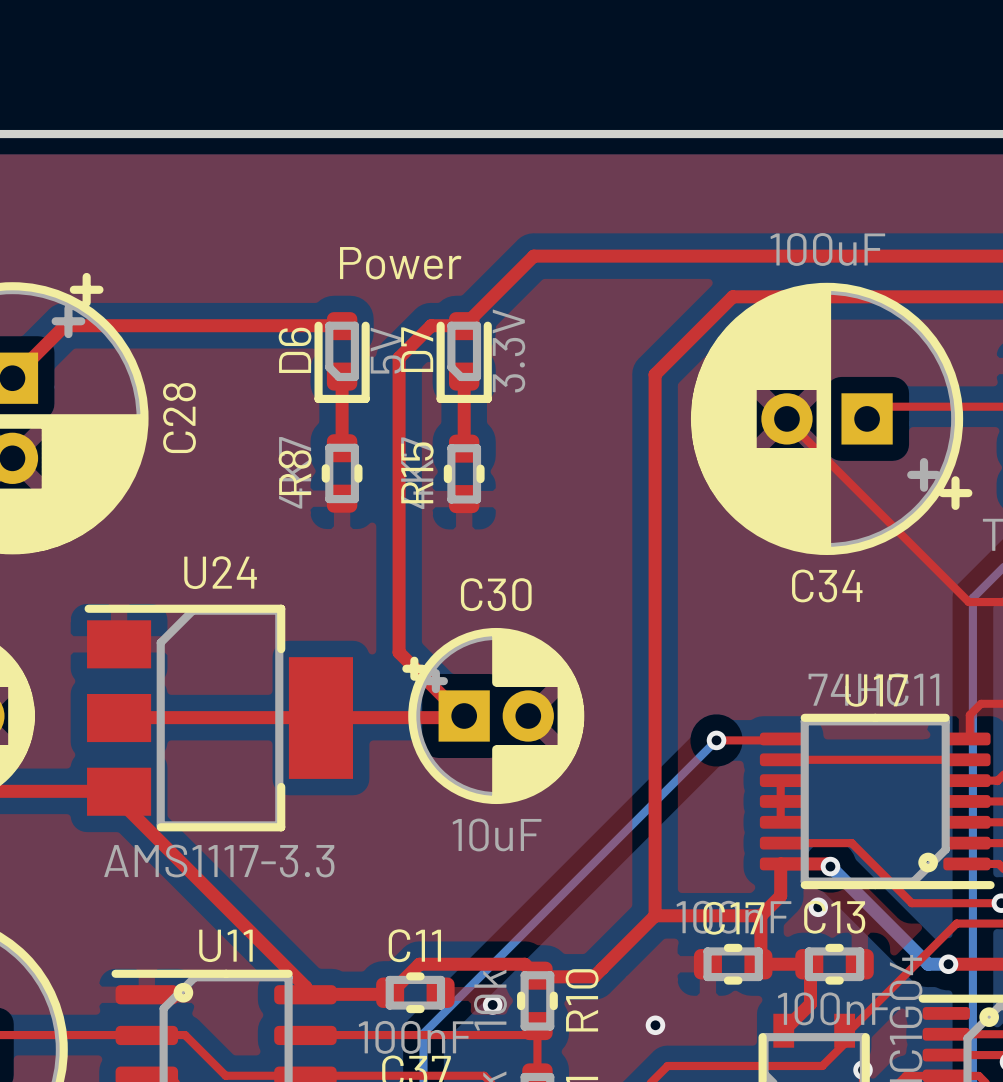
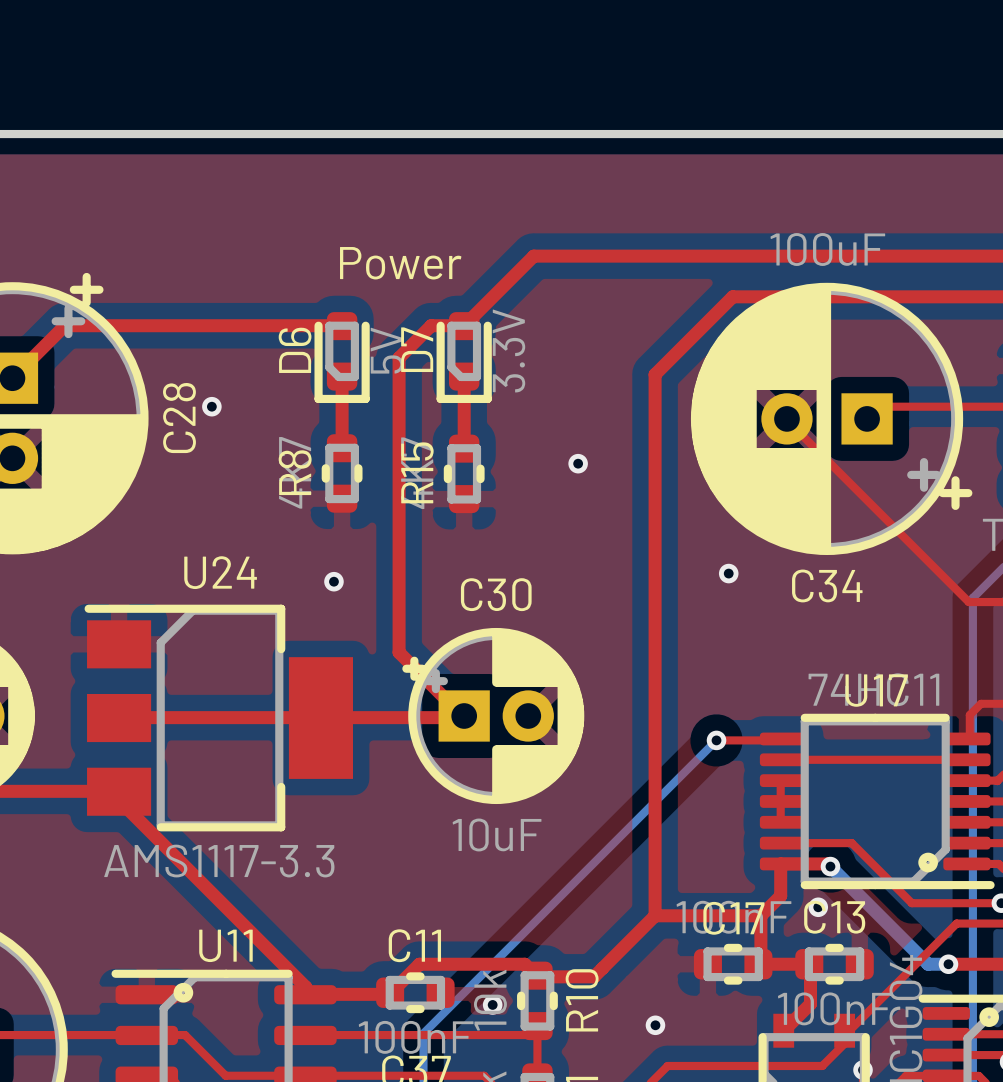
via: none -> (211, 406)
via: none -> (578, 463)
via: none -> (728, 573)
via: none -> (333, 581)

